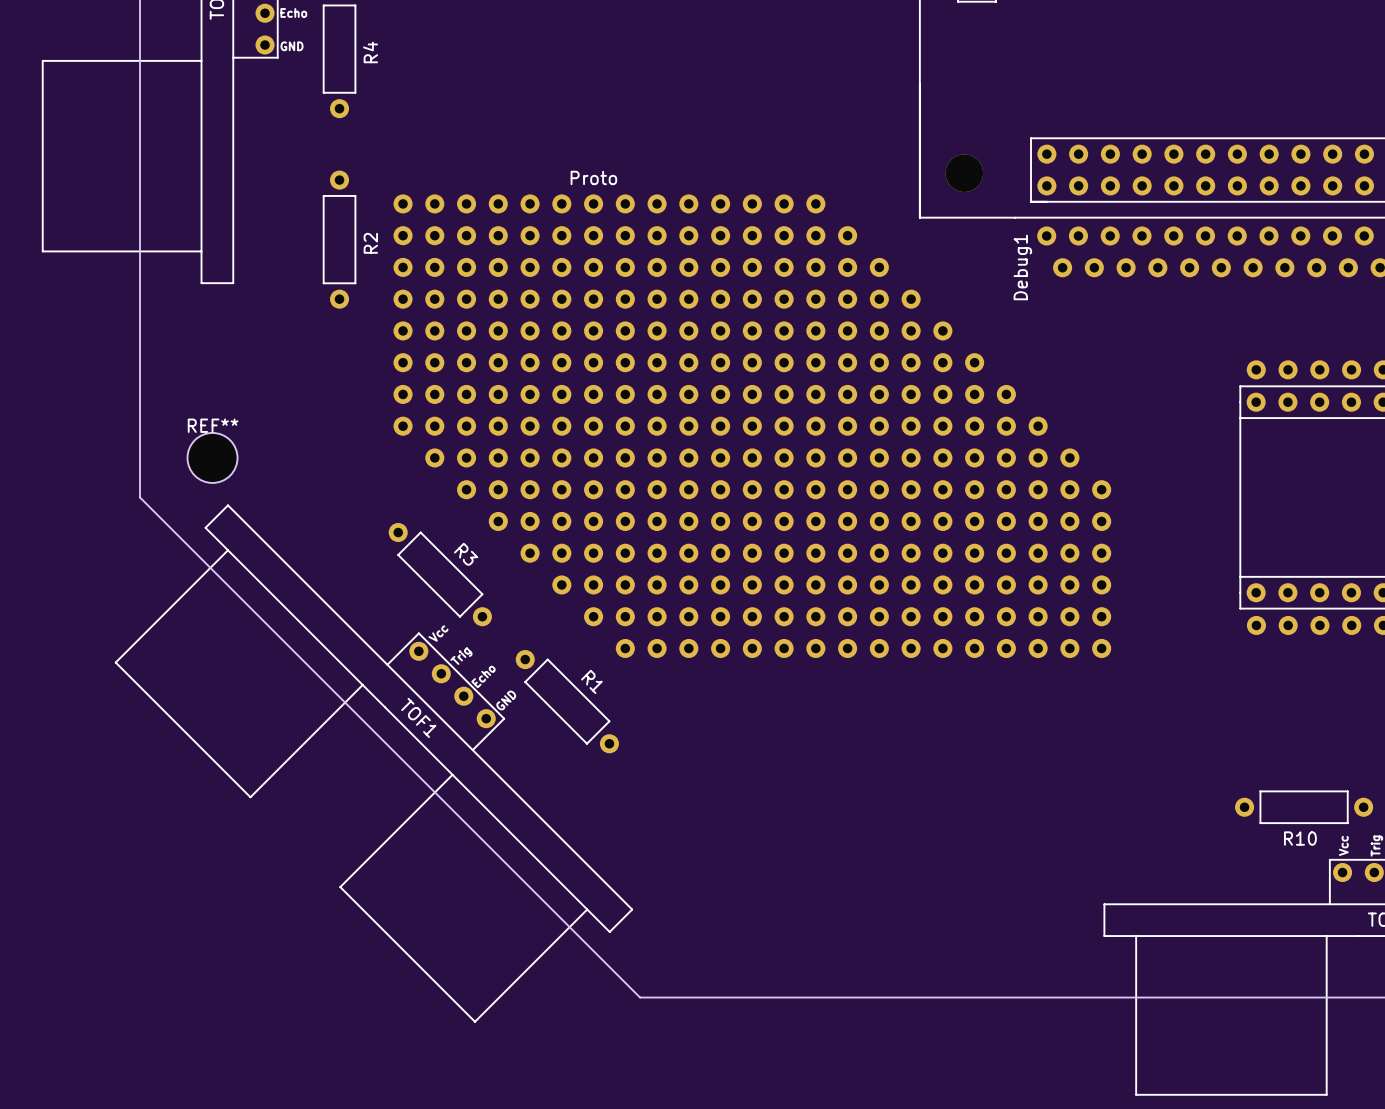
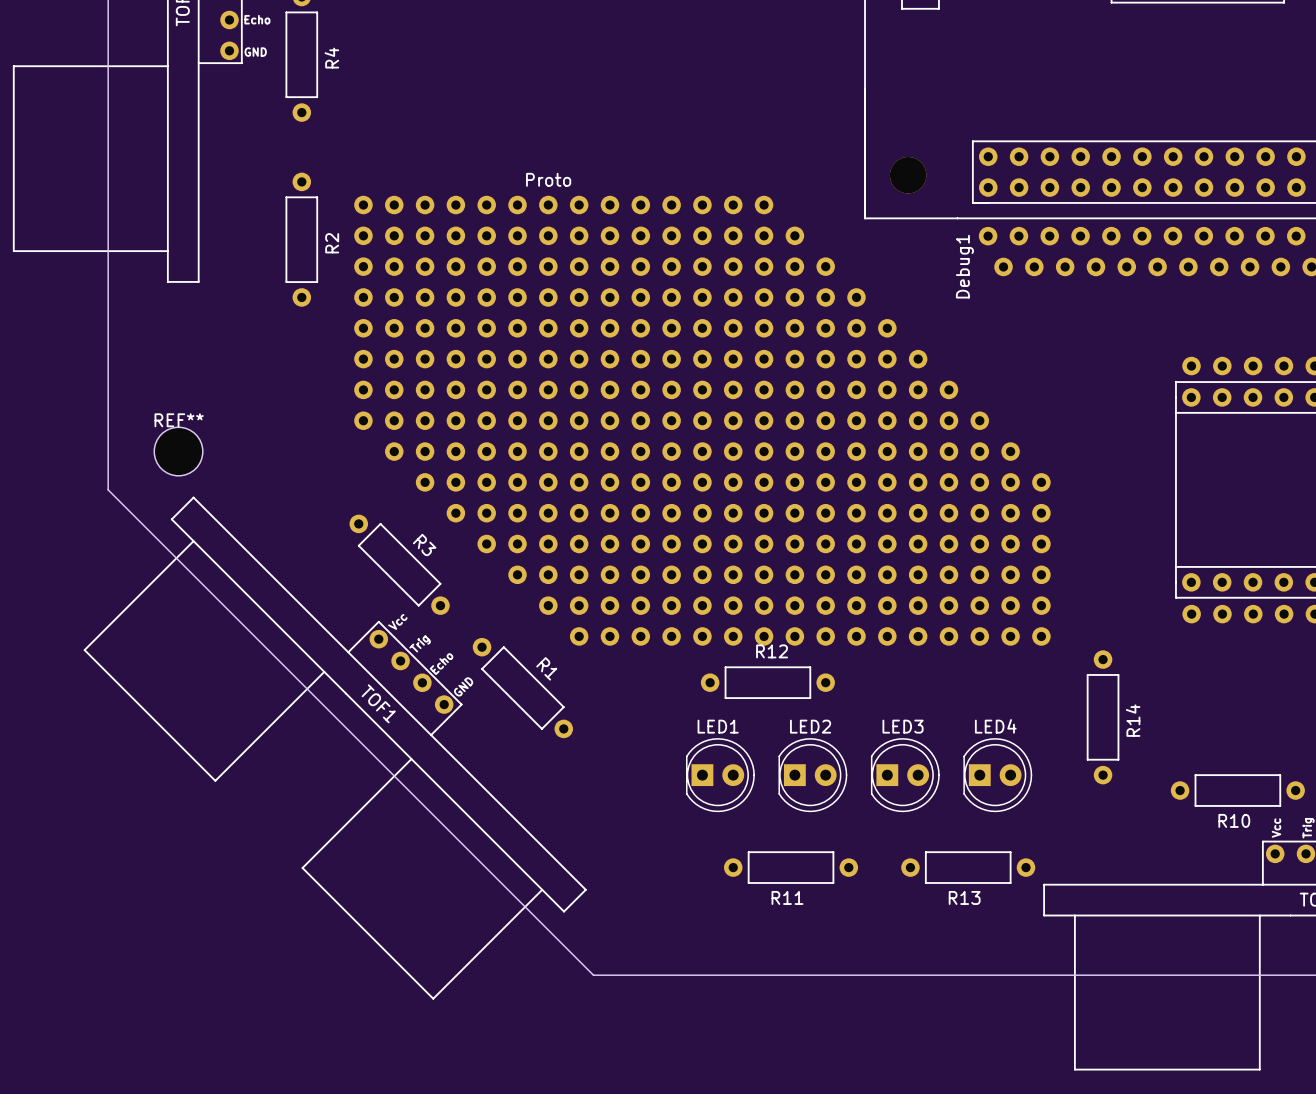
R12: none -> (767, 682)
R14: none -> (1103, 717)
LED1: none -> (720, 775)
LED2: none -> (812, 775)
LED3: none -> (905, 775)
LED4: none -> (997, 775)
R11: none -> (791, 867)
R13: none -> (968, 867)

